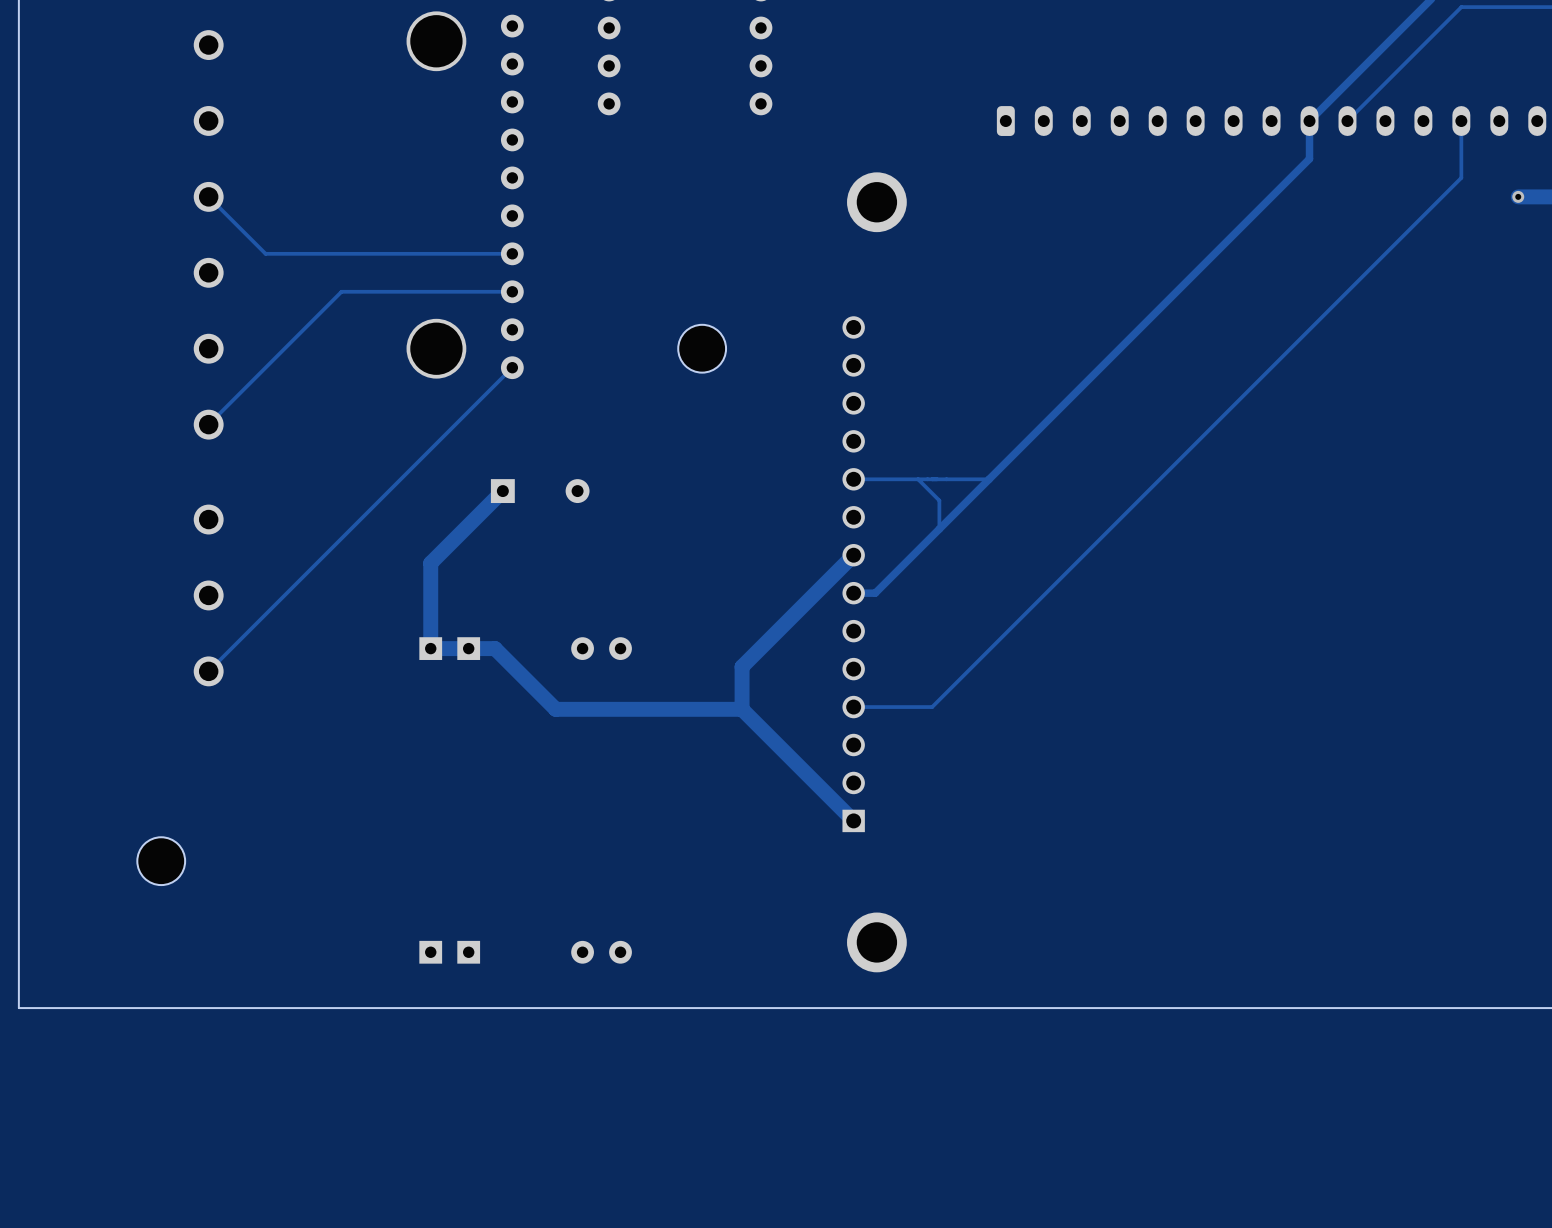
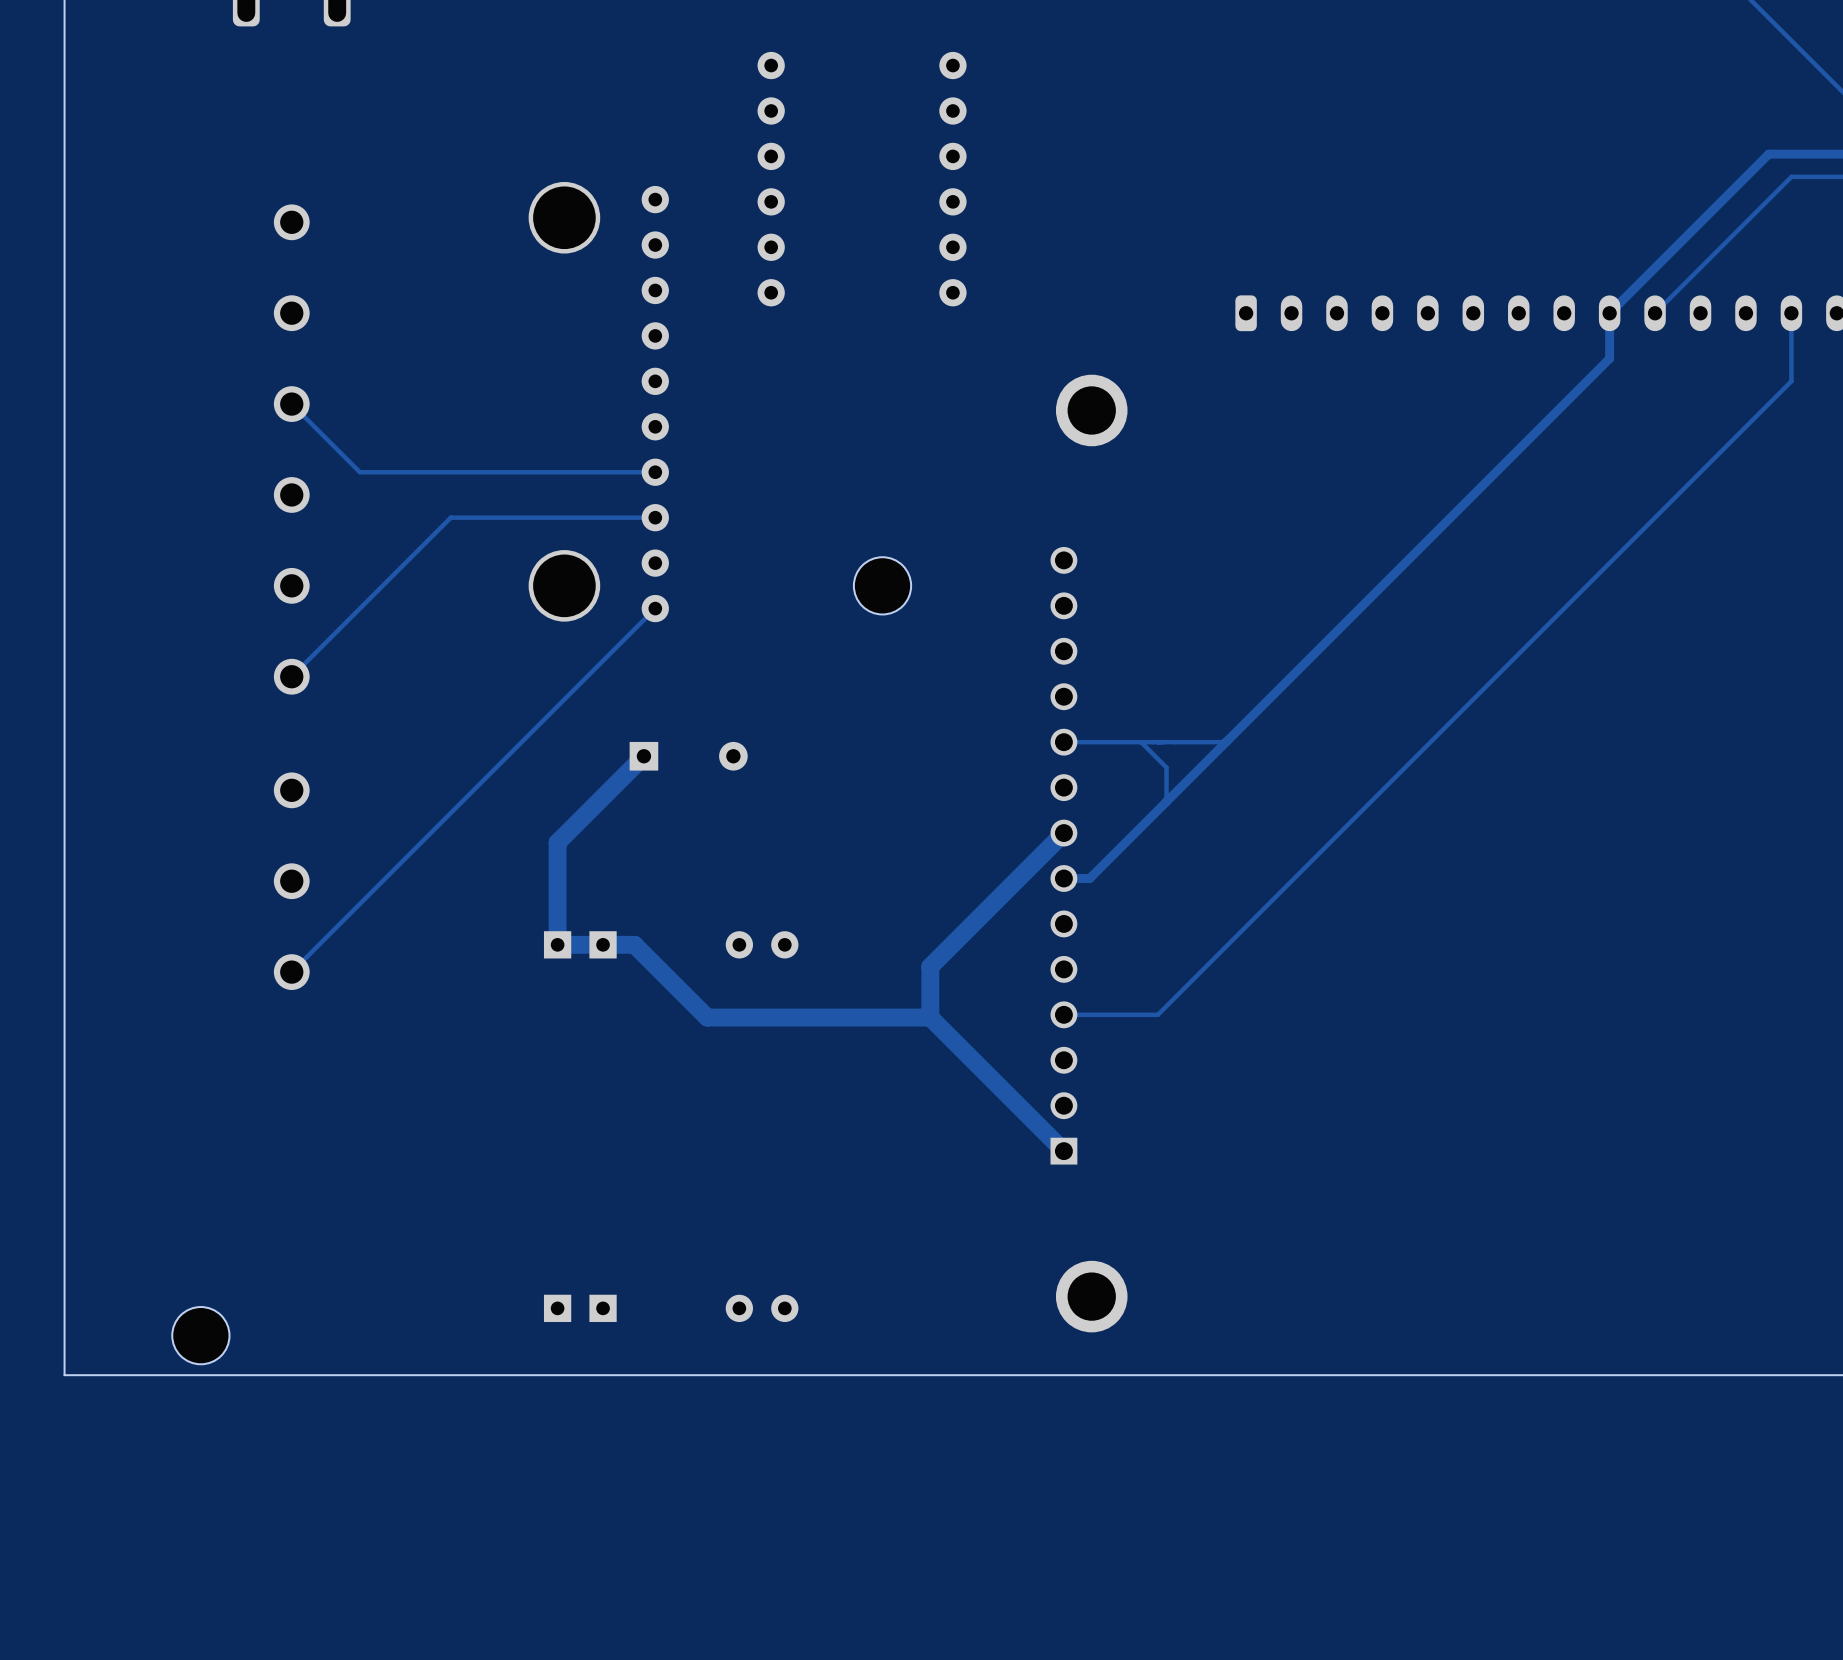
part position: (161, 861) -> (200, 1335)

